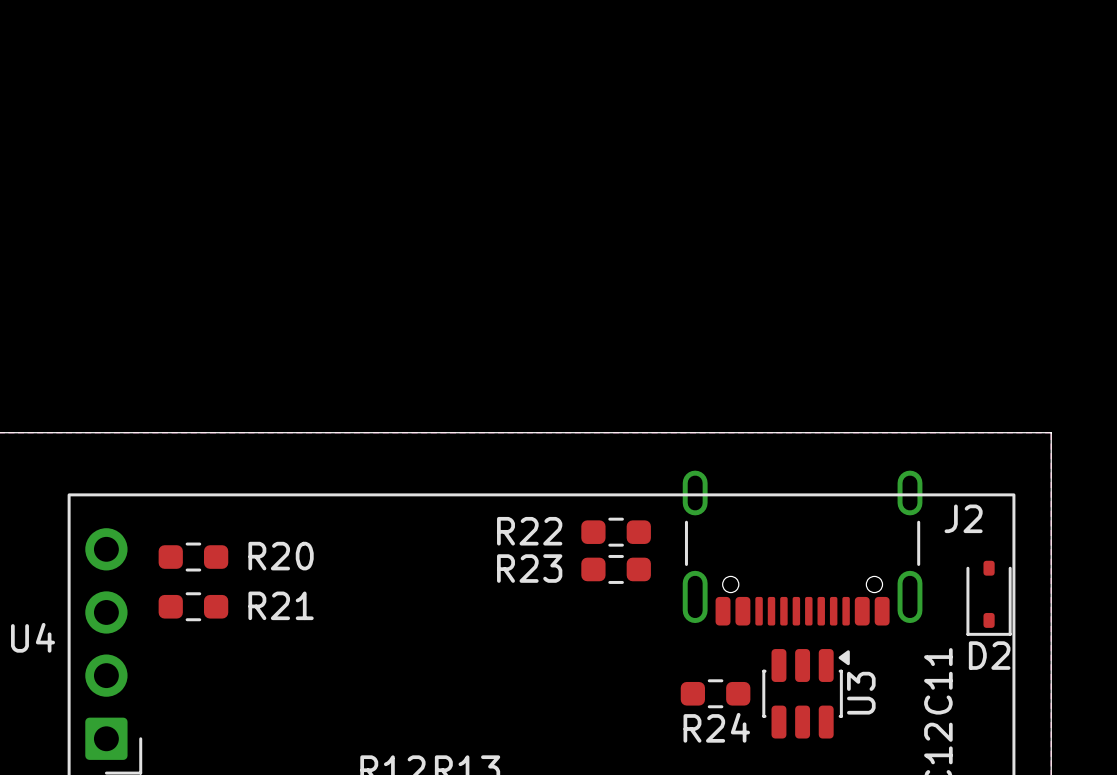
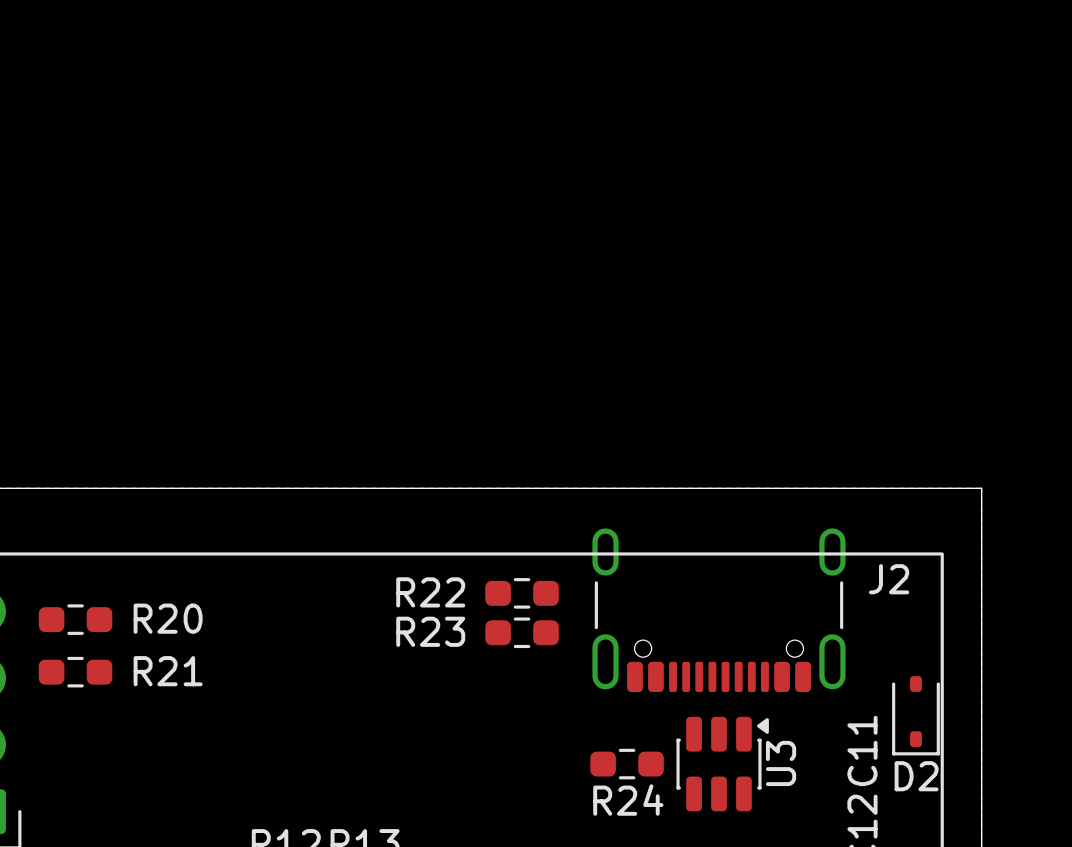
D2 position: (989, 598) -> (915, 715)

